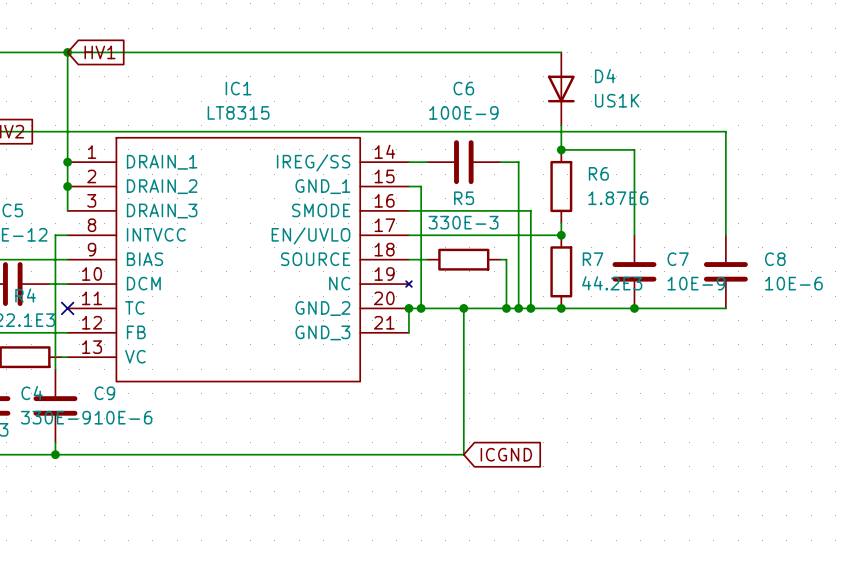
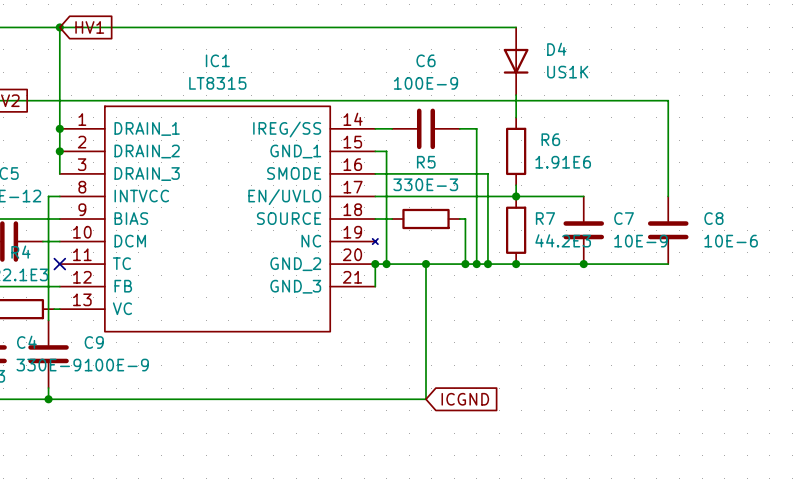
wire: (561, 149) (634, 149) (634, 235) -> (516, 196) (583, 196)
junction: (561, 149) -> none
R6 value: 1.87E6 (618, 198) -> 1.91E6 (563, 162)
C9 value: 10E-6 (123, 417) -> 100E-9 (116, 365)

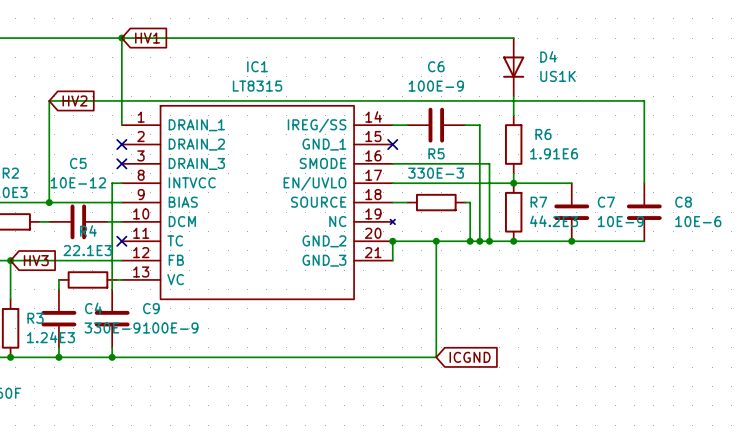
wire: (59, 128) (59, 173) -> none
junction: (59, 128) -> none
junction: (59, 151) -> none
no-connect mark: none -> (121, 144)
wire: (375, 151) (386, 151) (386, 264) -> none
no-connect mark: none -> (392, 144)
no-connect mark: none -> (121, 163)
junction: (386, 264) -> none

